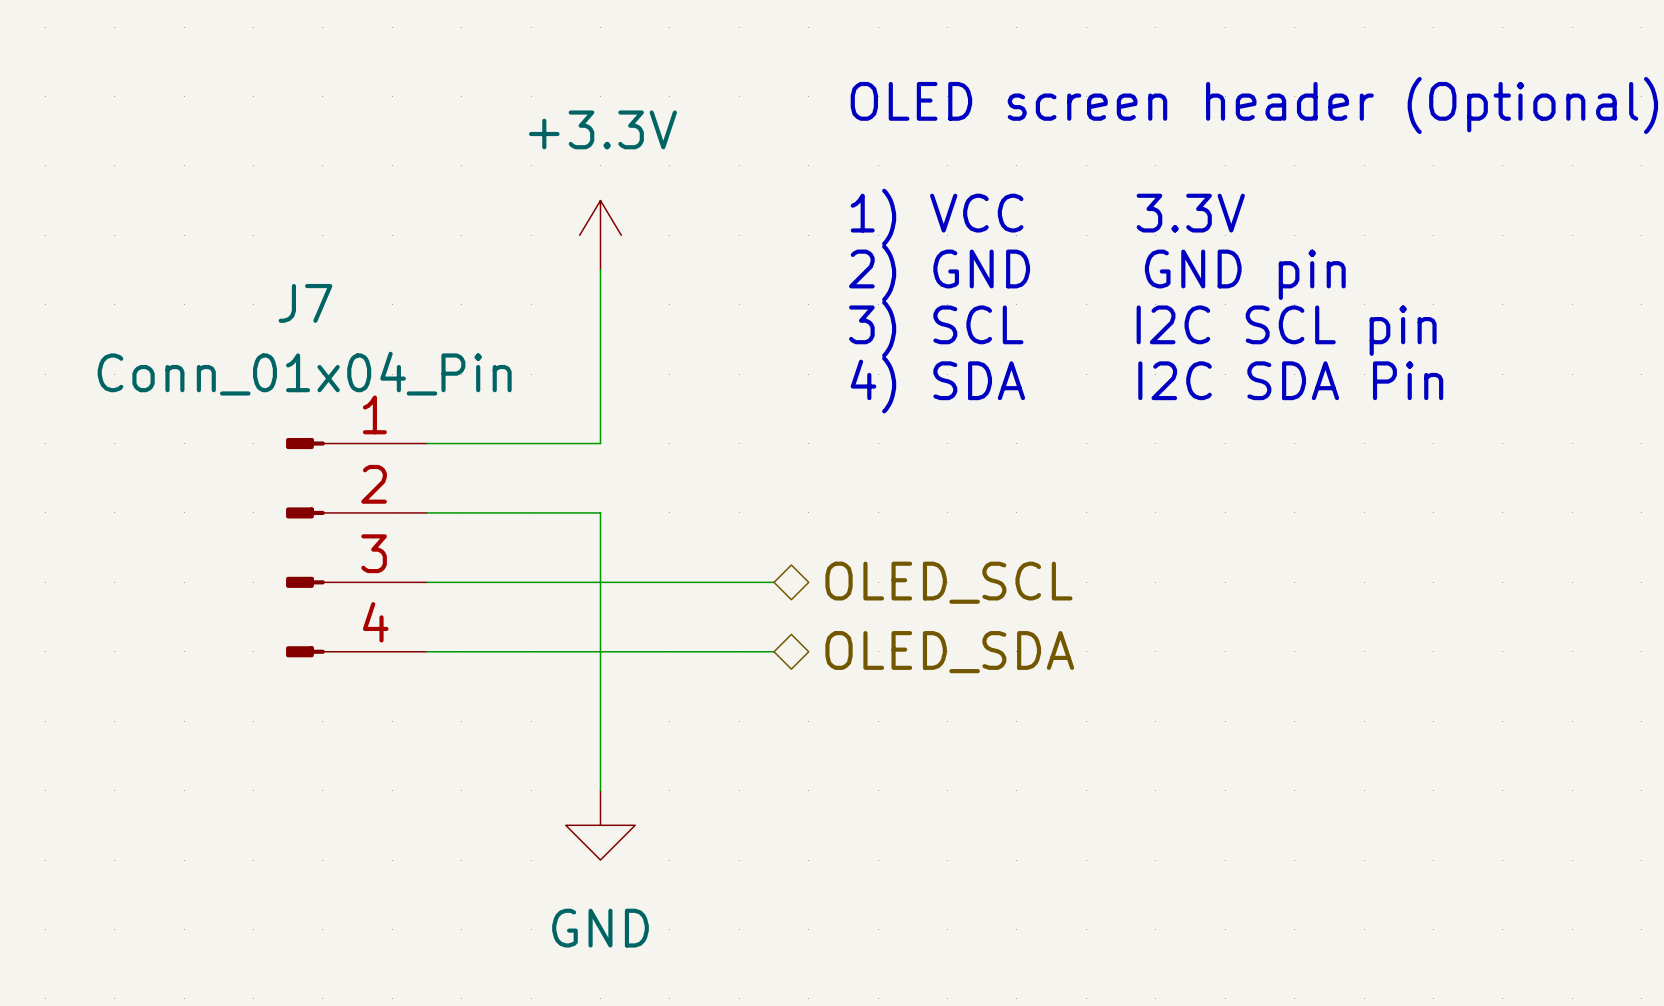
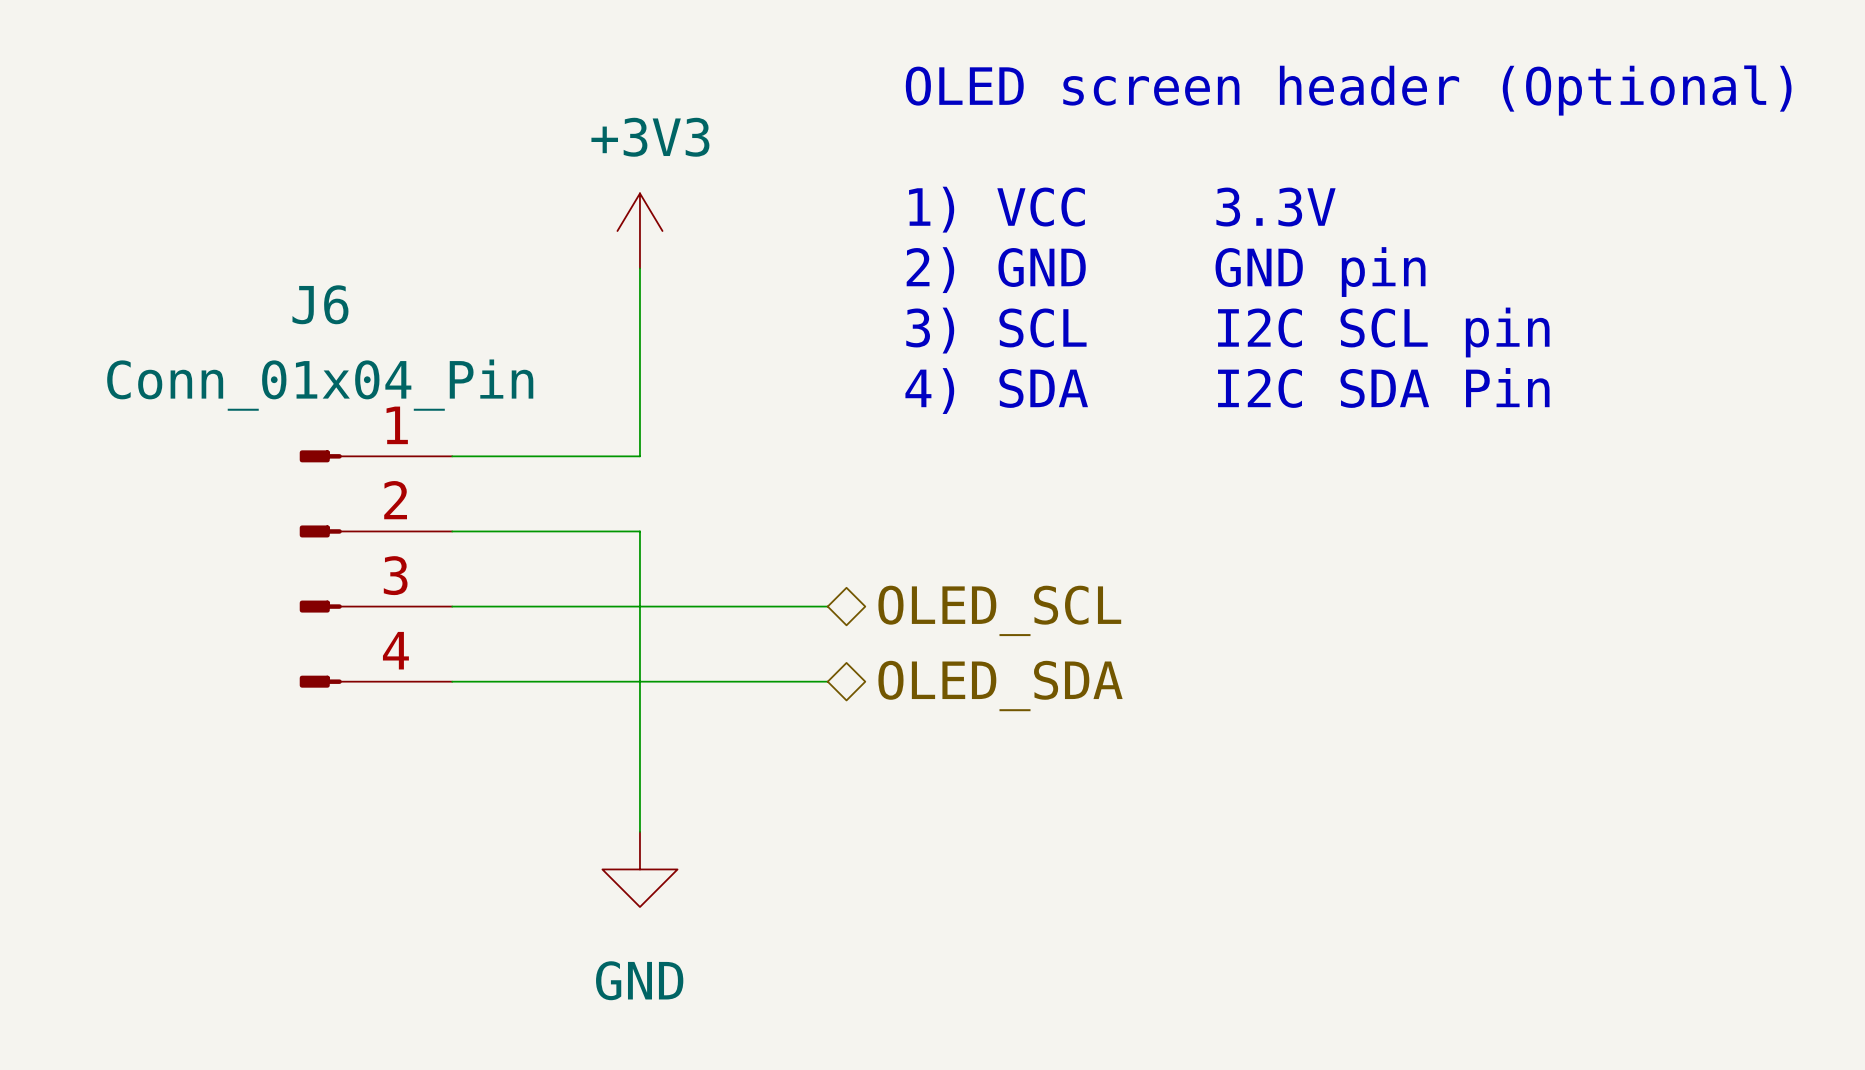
power symbol: +3.3V (600, 235) -> +3V3 (639, 231)
J7 name: J7 (305, 303) -> J6 (320, 304)

